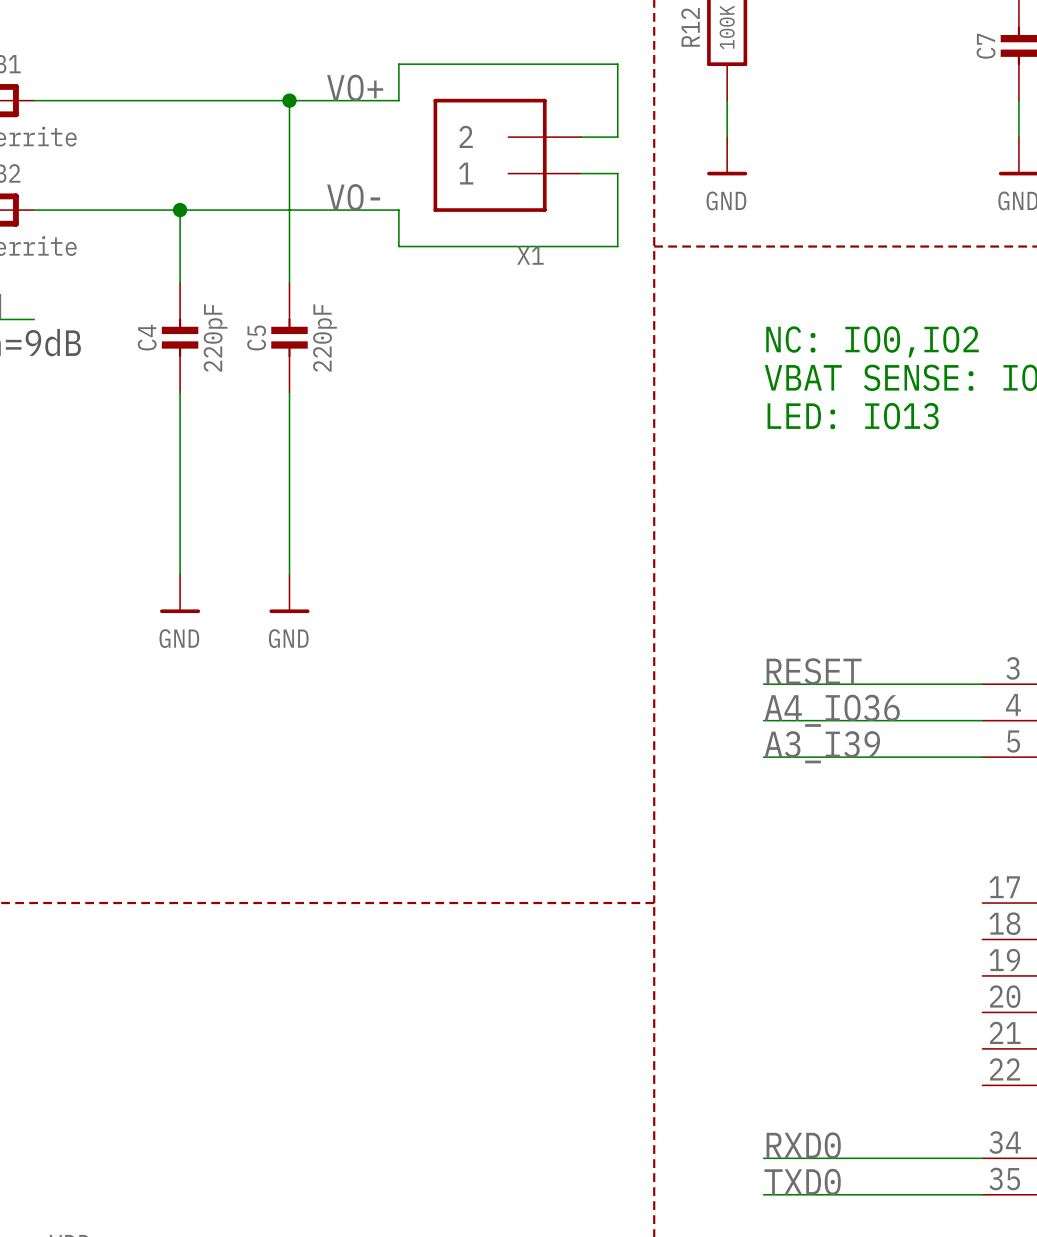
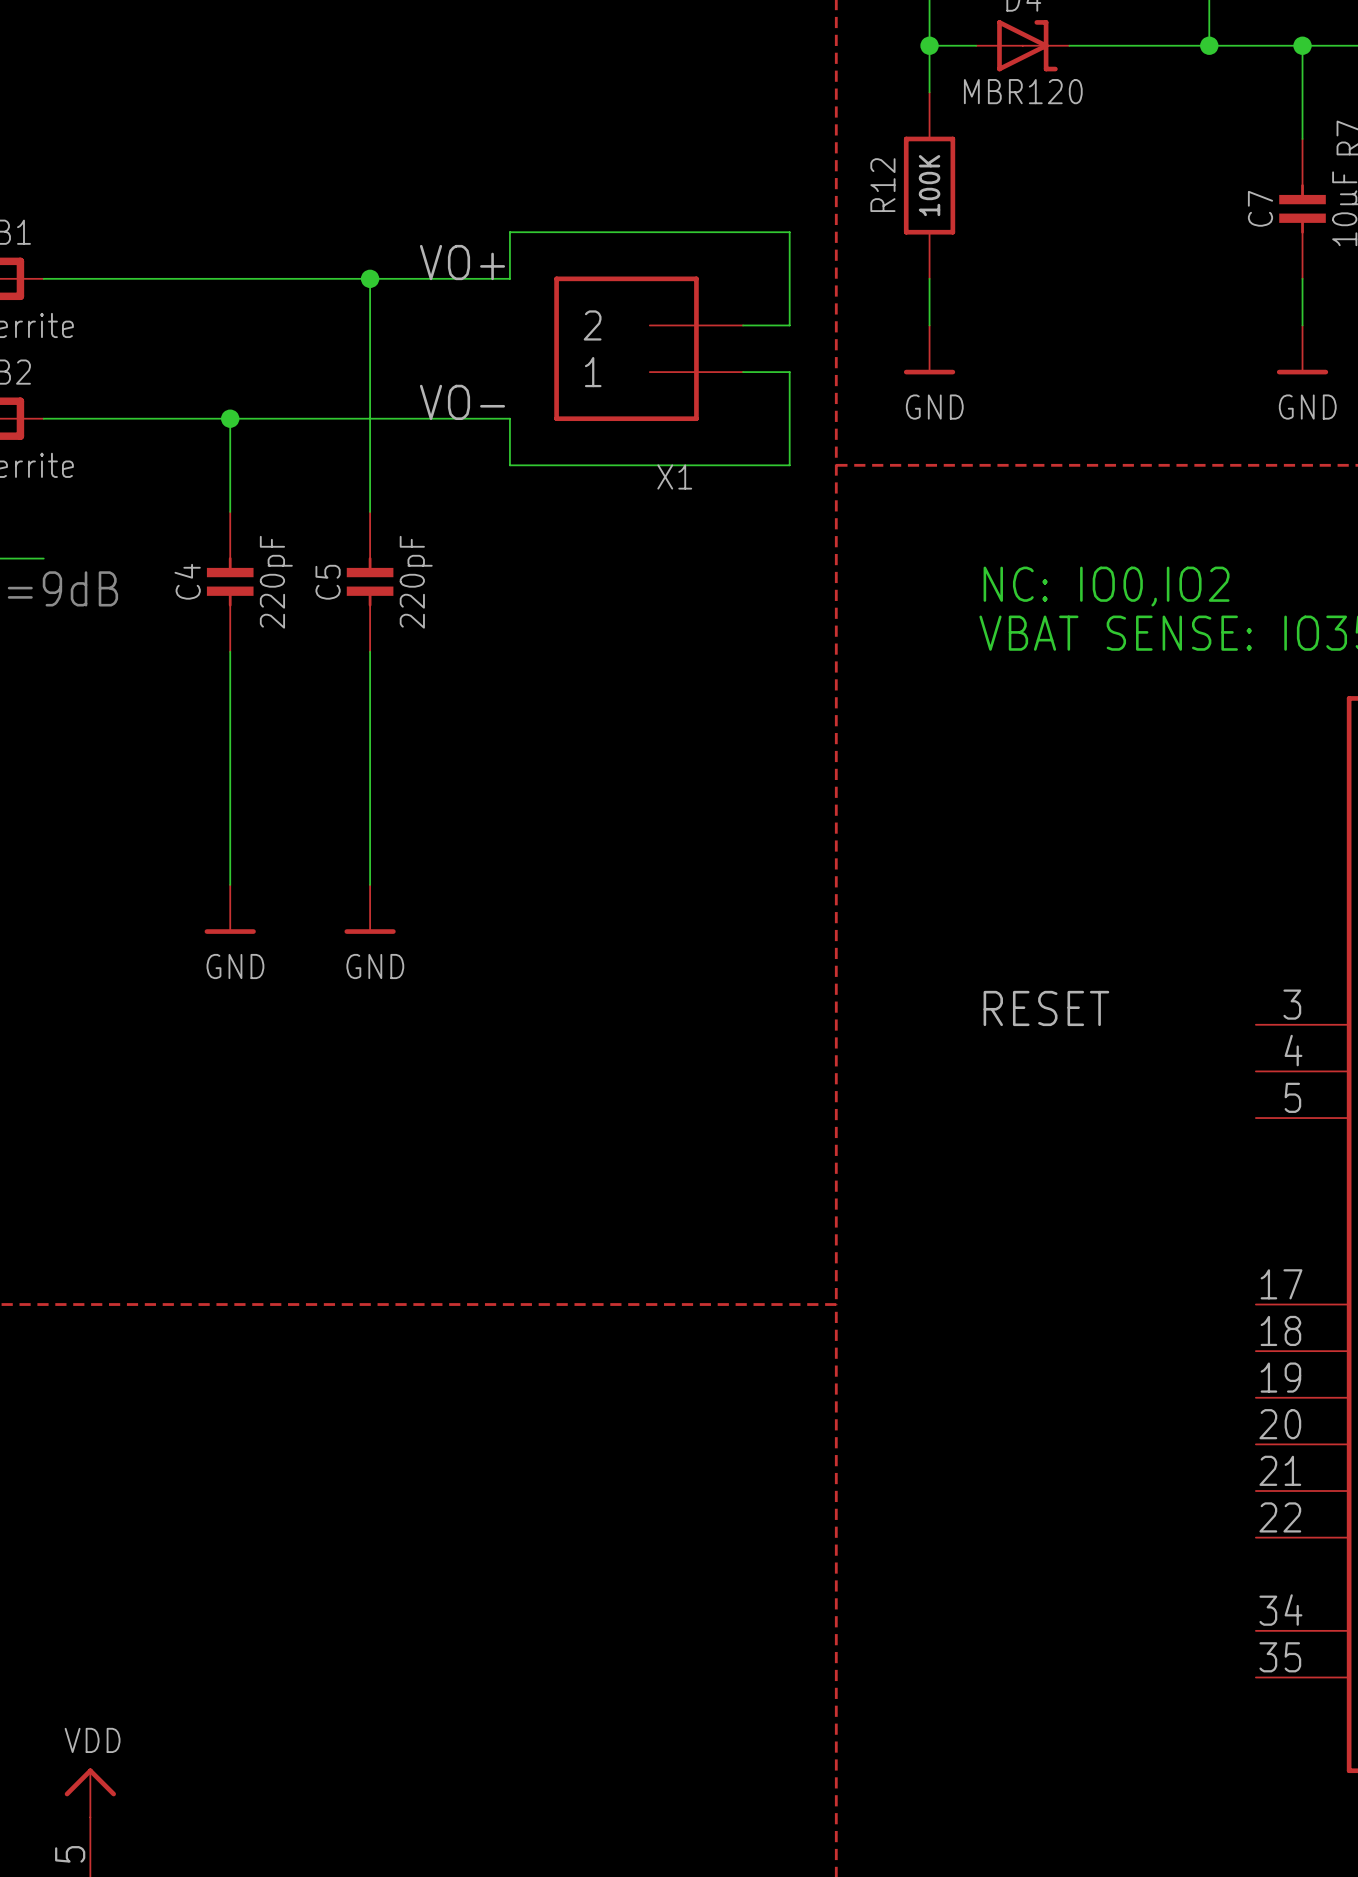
text: LED: IO13 (853, 416) -> none
wire: (763, 684) (982, 684) -> none
label: A4_IO36 (832, 710) -> none
wire: (763, 720) (982, 720) -> none
label: A3_I39 (822, 747) -> none
wire: (763, 757) (982, 757) -> none
label: RXD0 (803, 1145) -> none
wire: (763, 1158) (982, 1158) -> none
label: TXD0 (802, 1182) -> none
wire: (763, 1194) (982, 1194) -> none

